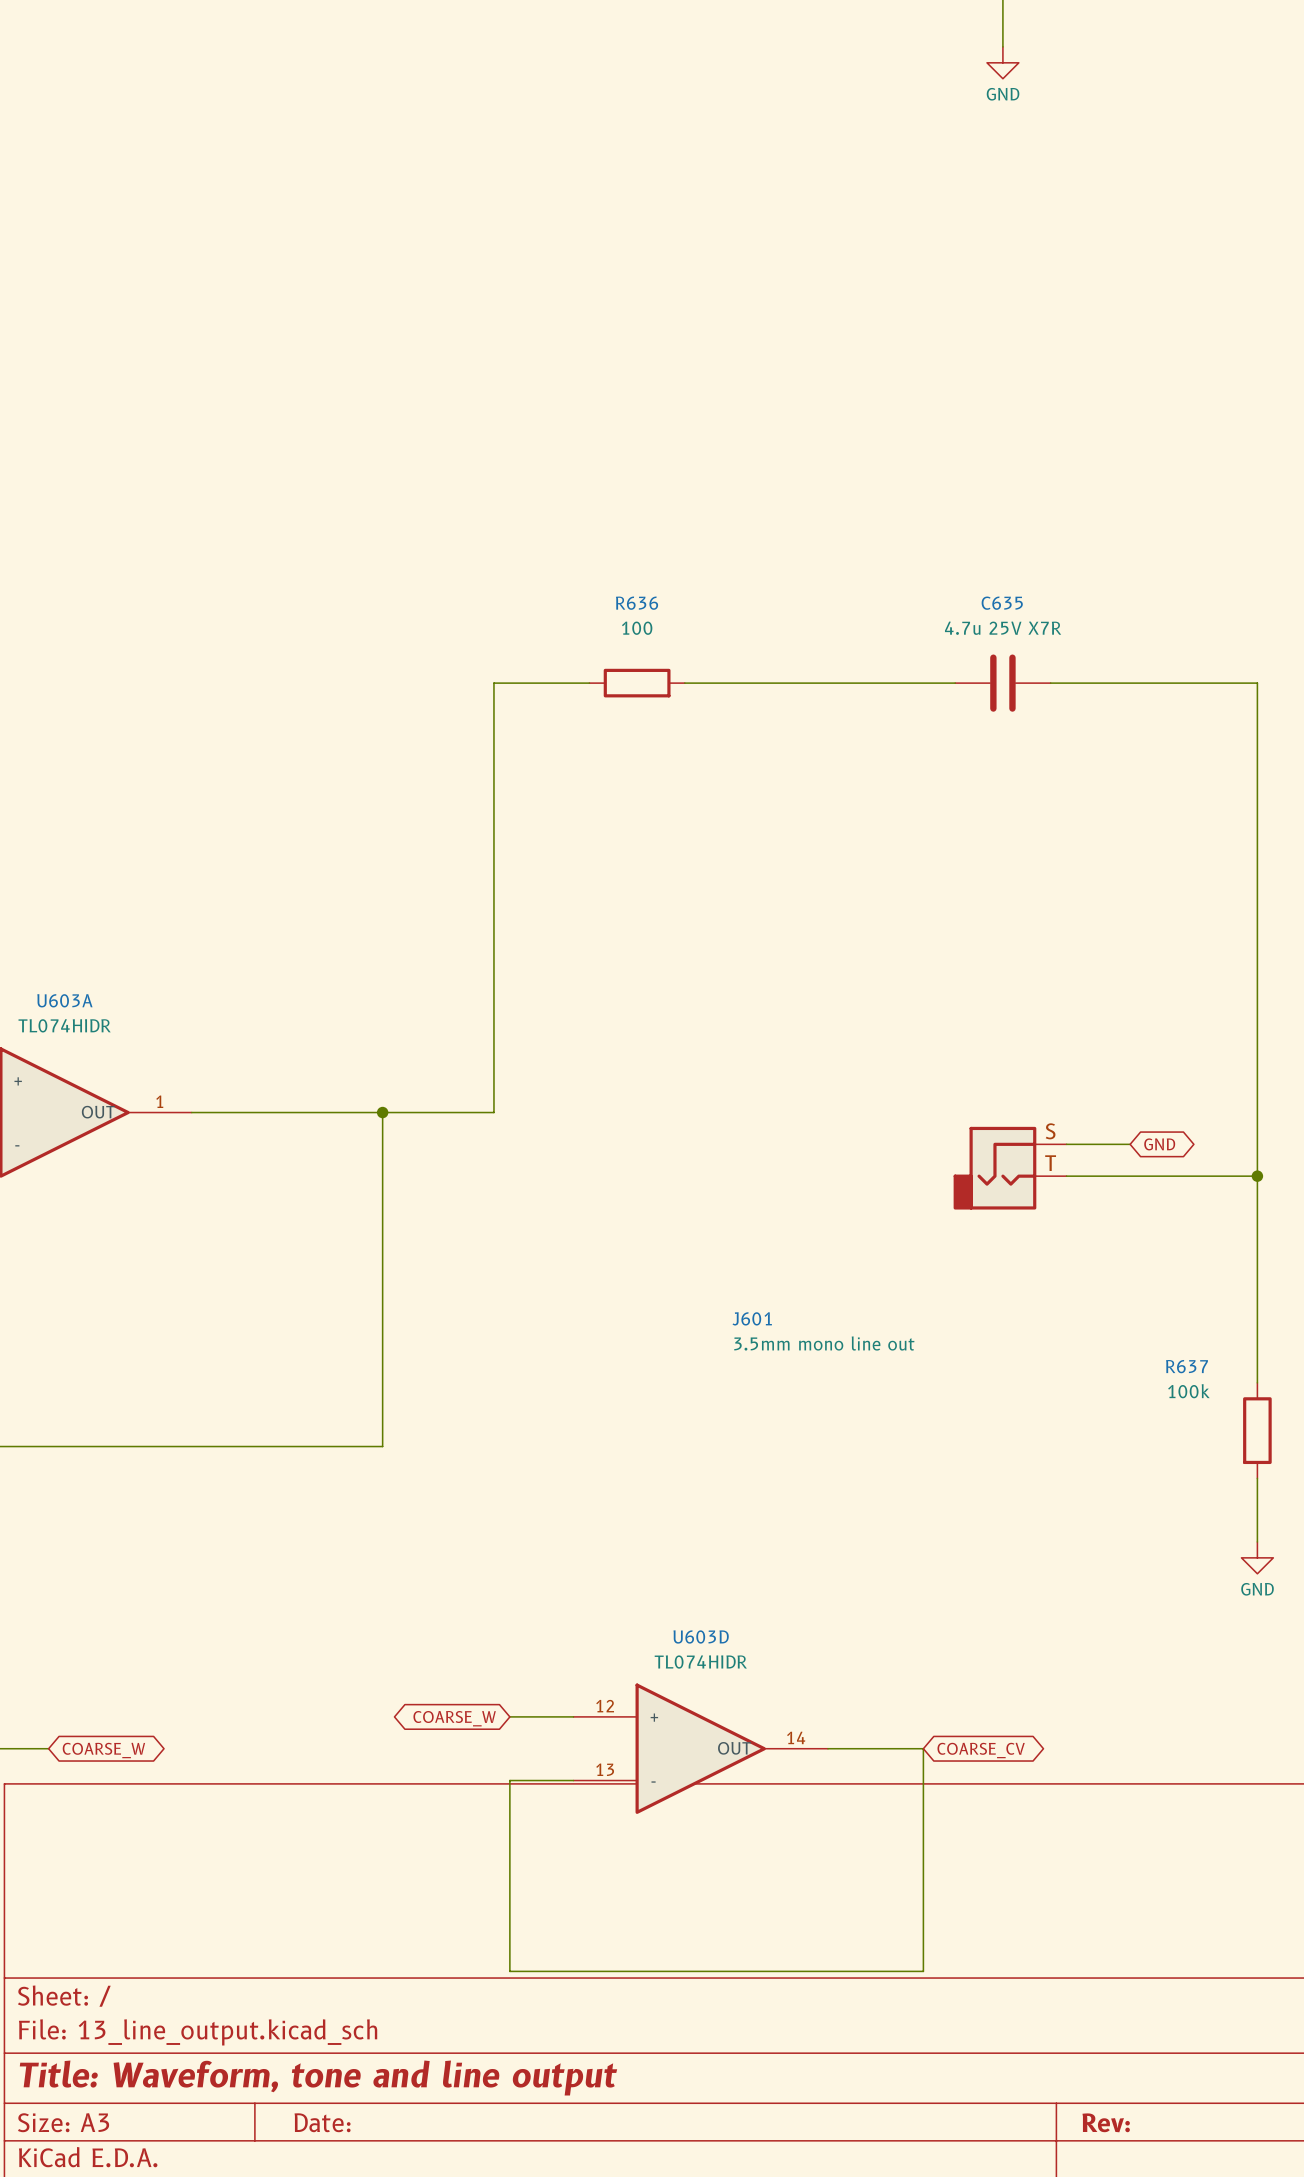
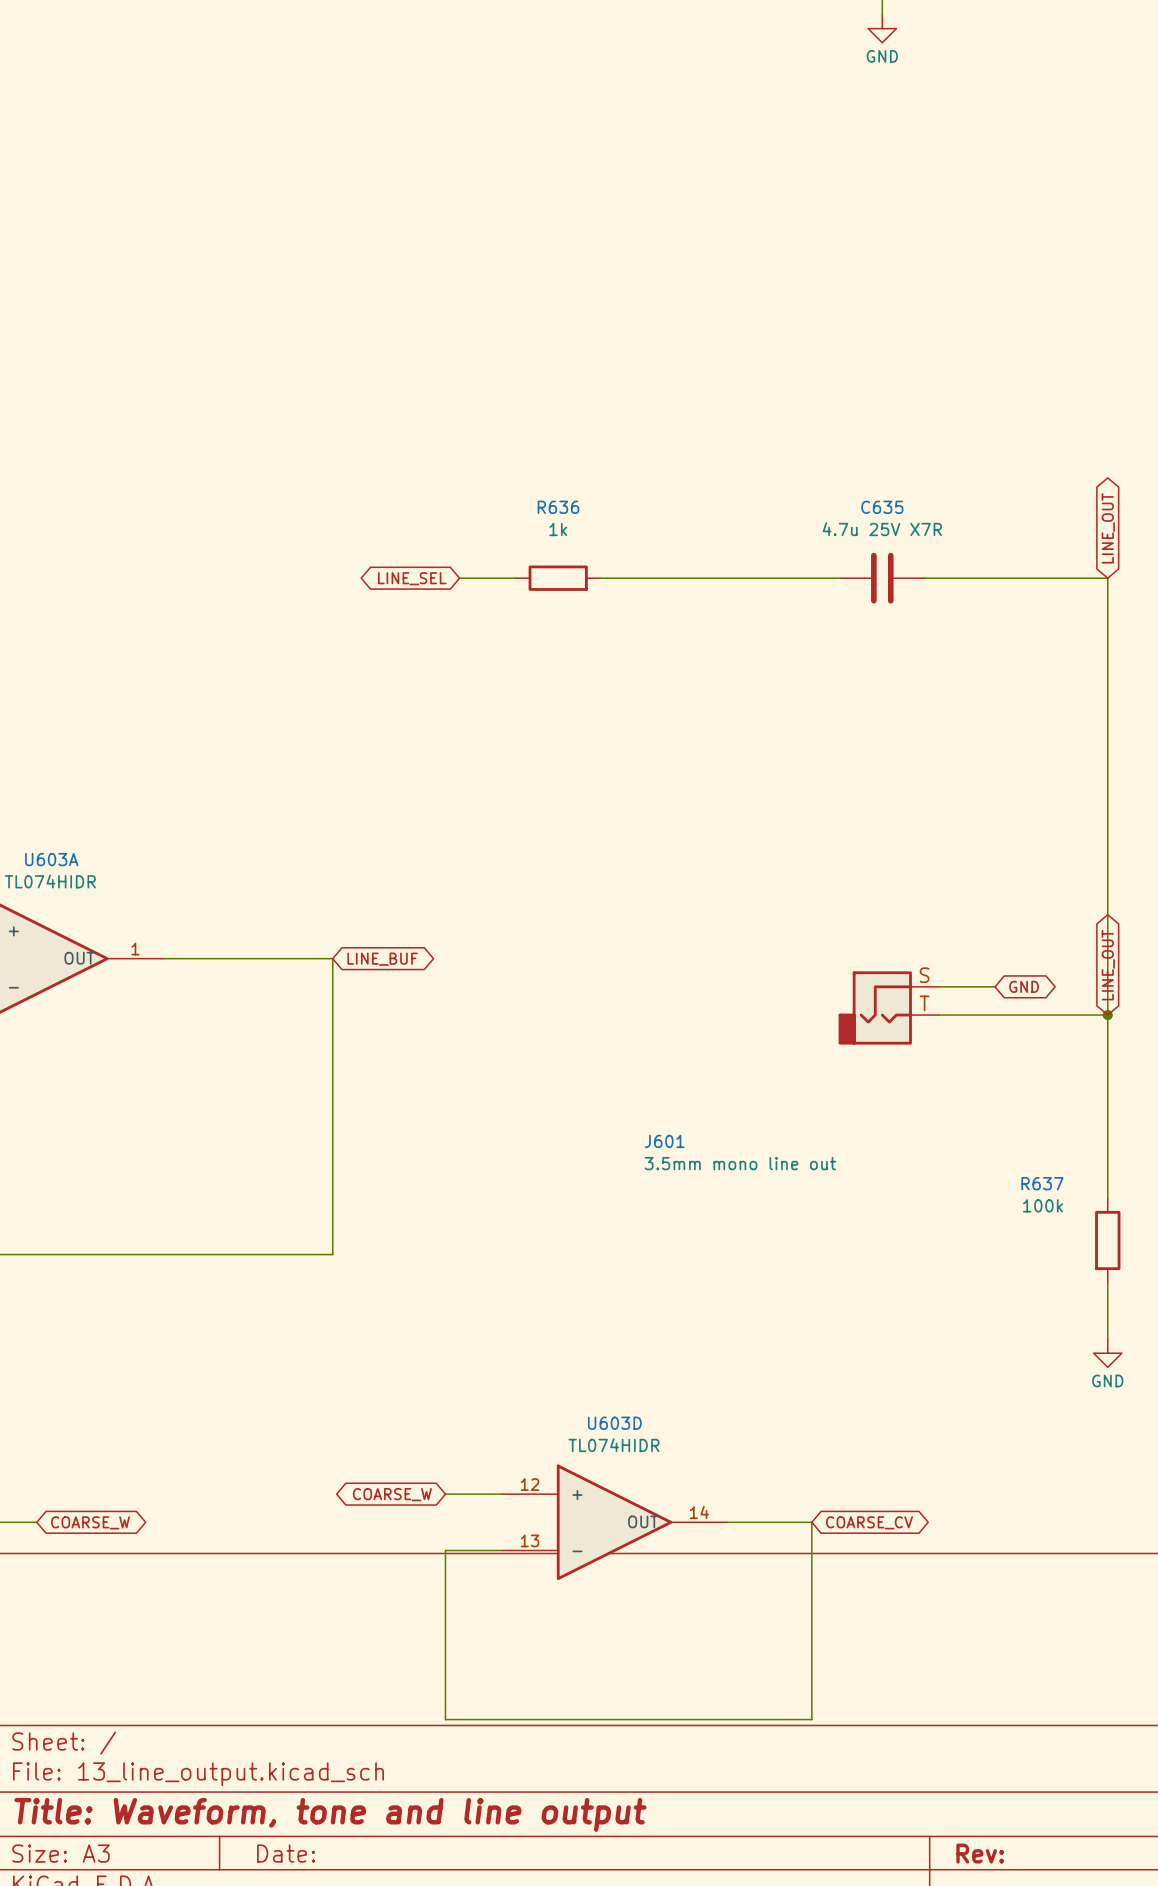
R636 value: 100 (637, 628) -> 1k (558, 529)
global label: none -> LINE_OUT (1108, 528)
wire: (525, 683) (493, 683) (493, 1112) (382, 1112) -> none
global label: none -> LINE_SEL (412, 578)
junction: (382, 1112) -> none
global label: none -> LINE_BUF (382, 959)
global label: none -> LINE_OUT (1108, 965)

